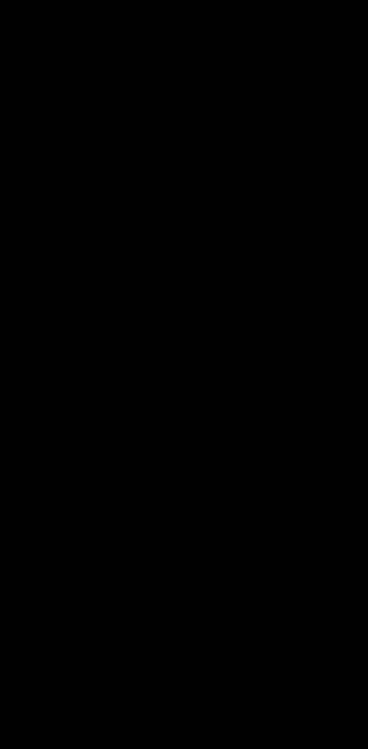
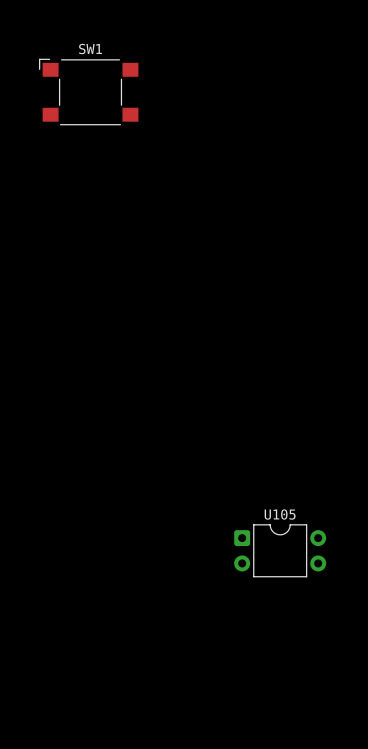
SW1: none -> (88, 92)
U105: none -> (280, 550)

